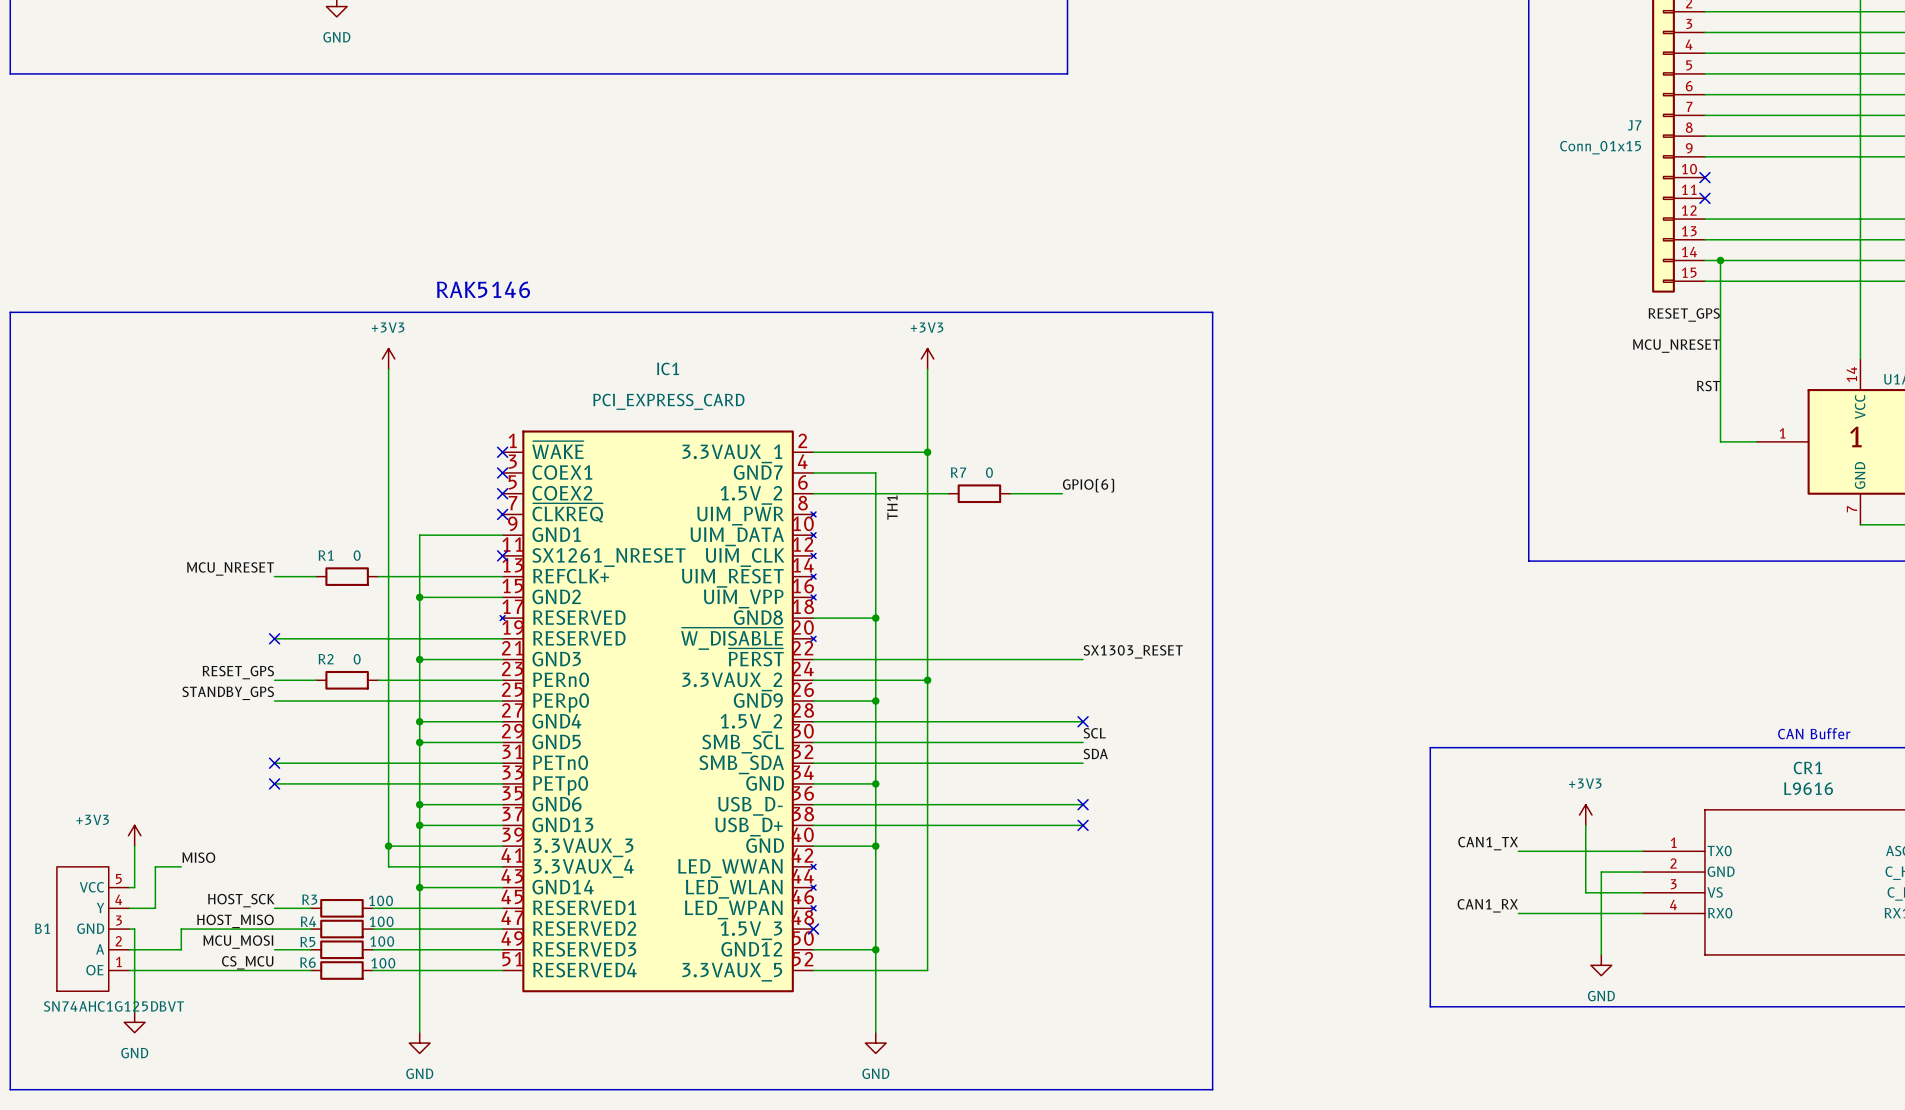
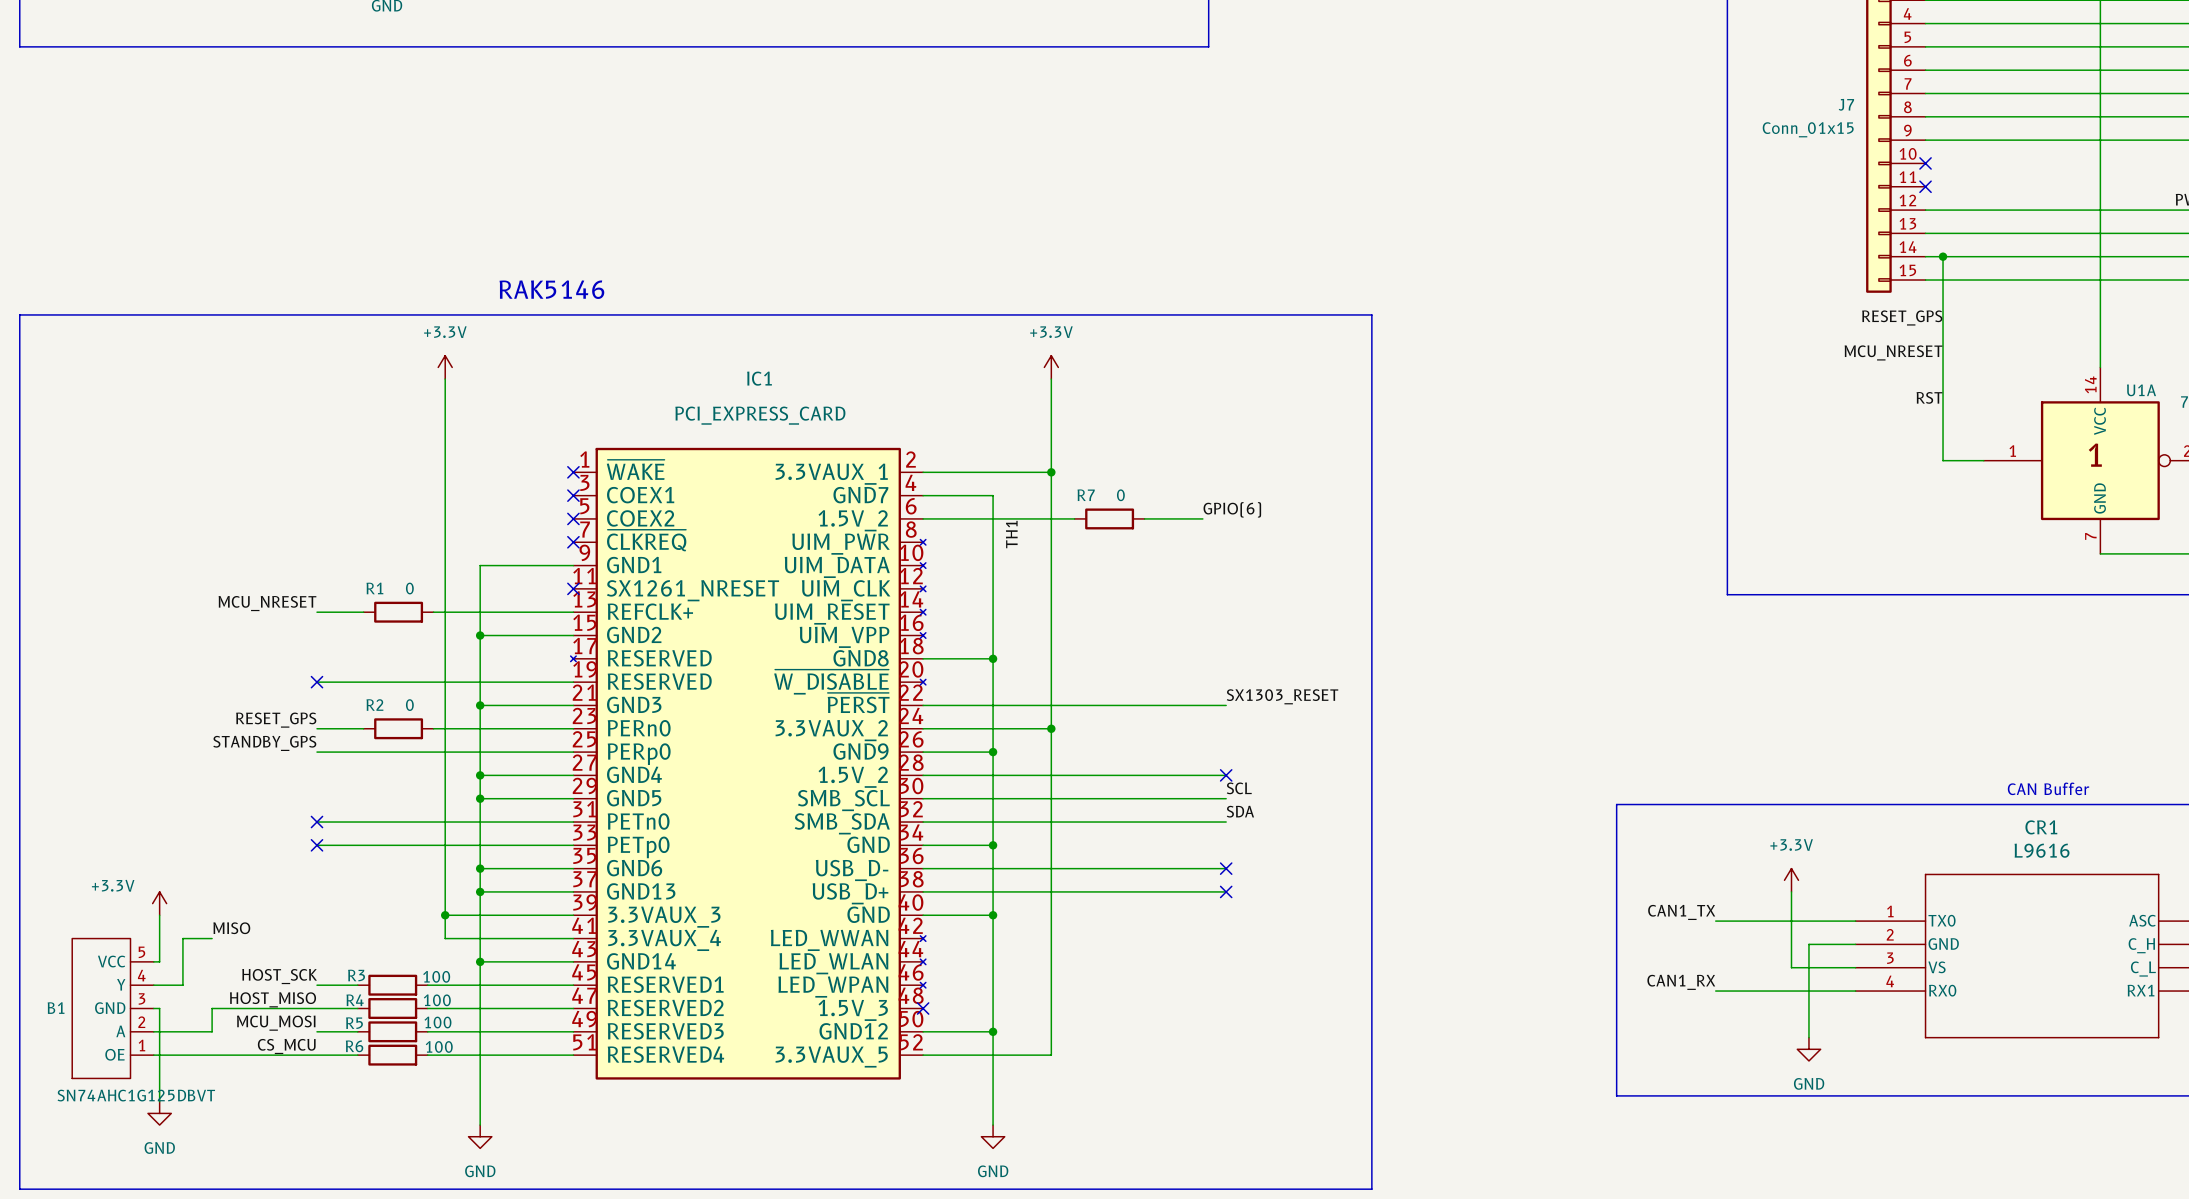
power symbol: +3V3 (388, 358) -> +3.3V (445, 367)
power symbol: +3V3 (927, 358) -> +3.3V (1051, 367)
power symbol: +3V3 (1585, 815) -> +3.3V (1791, 880)
power symbol: +3V3 (134, 835) -> +3.3V (159, 903)

